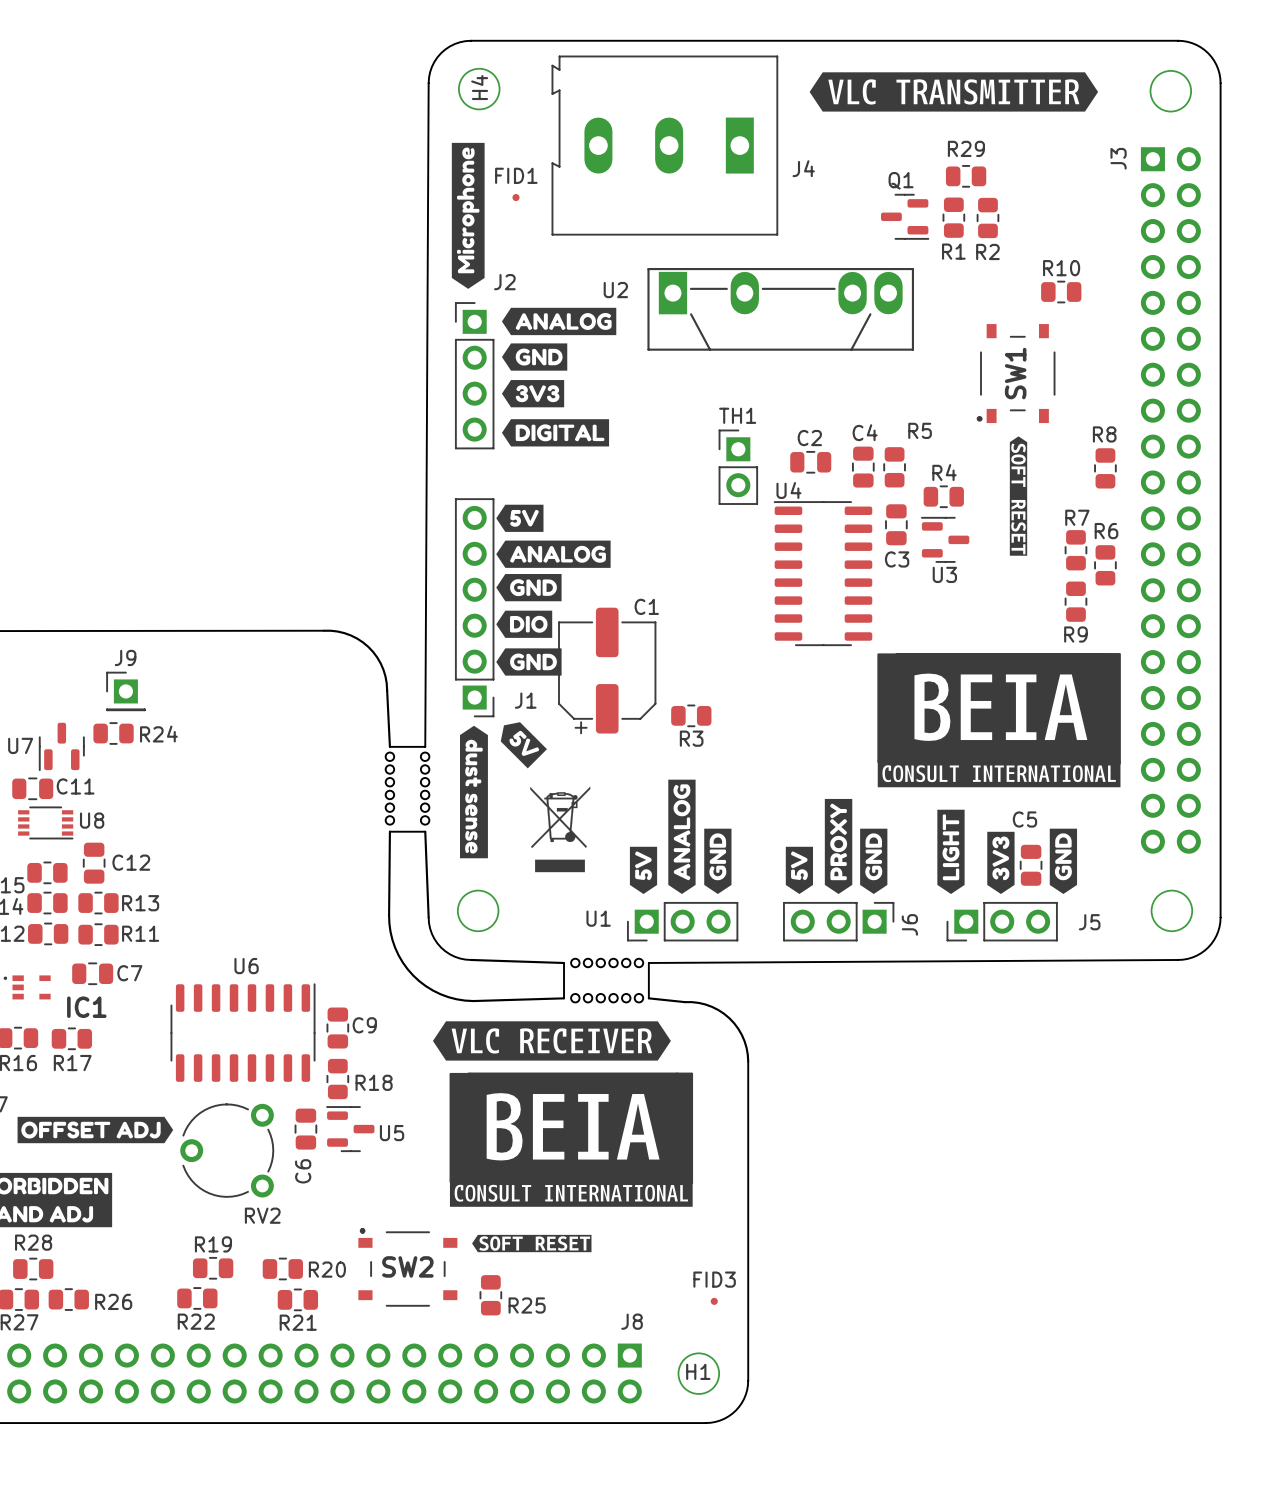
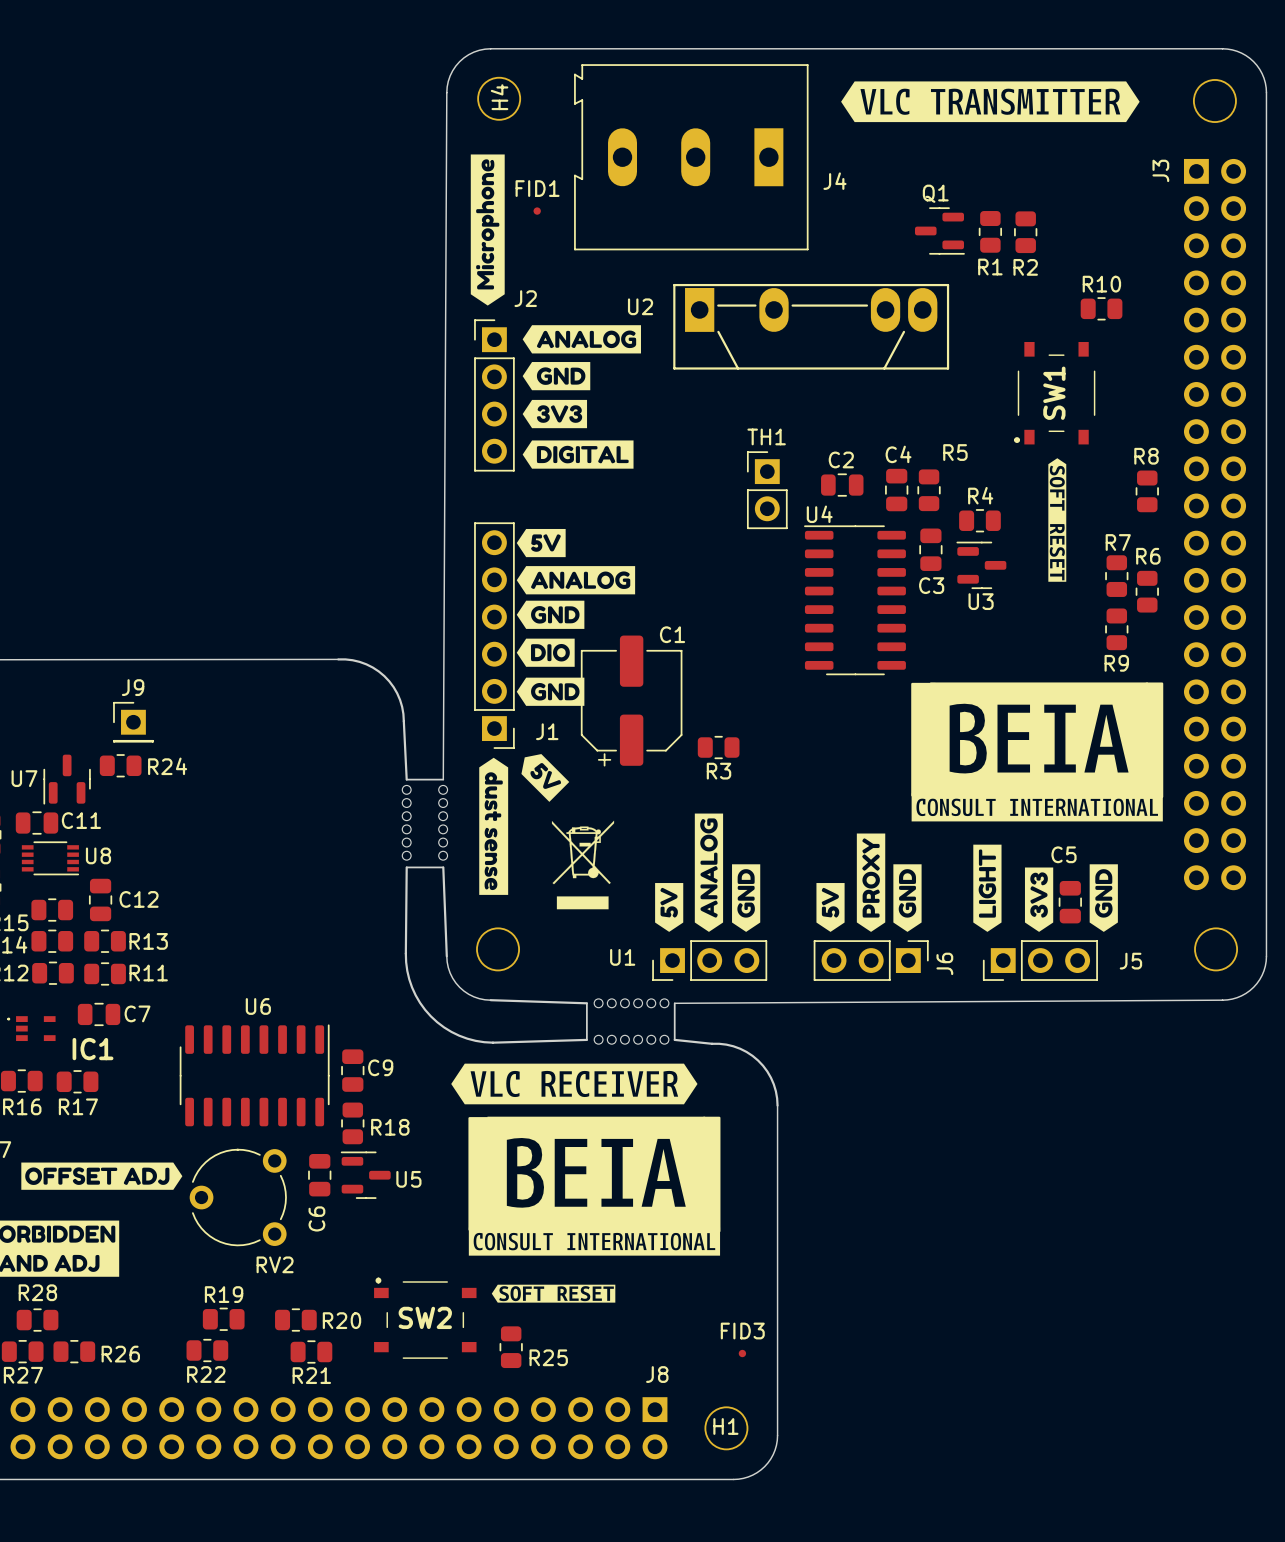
R29: (966, 176) -> none

